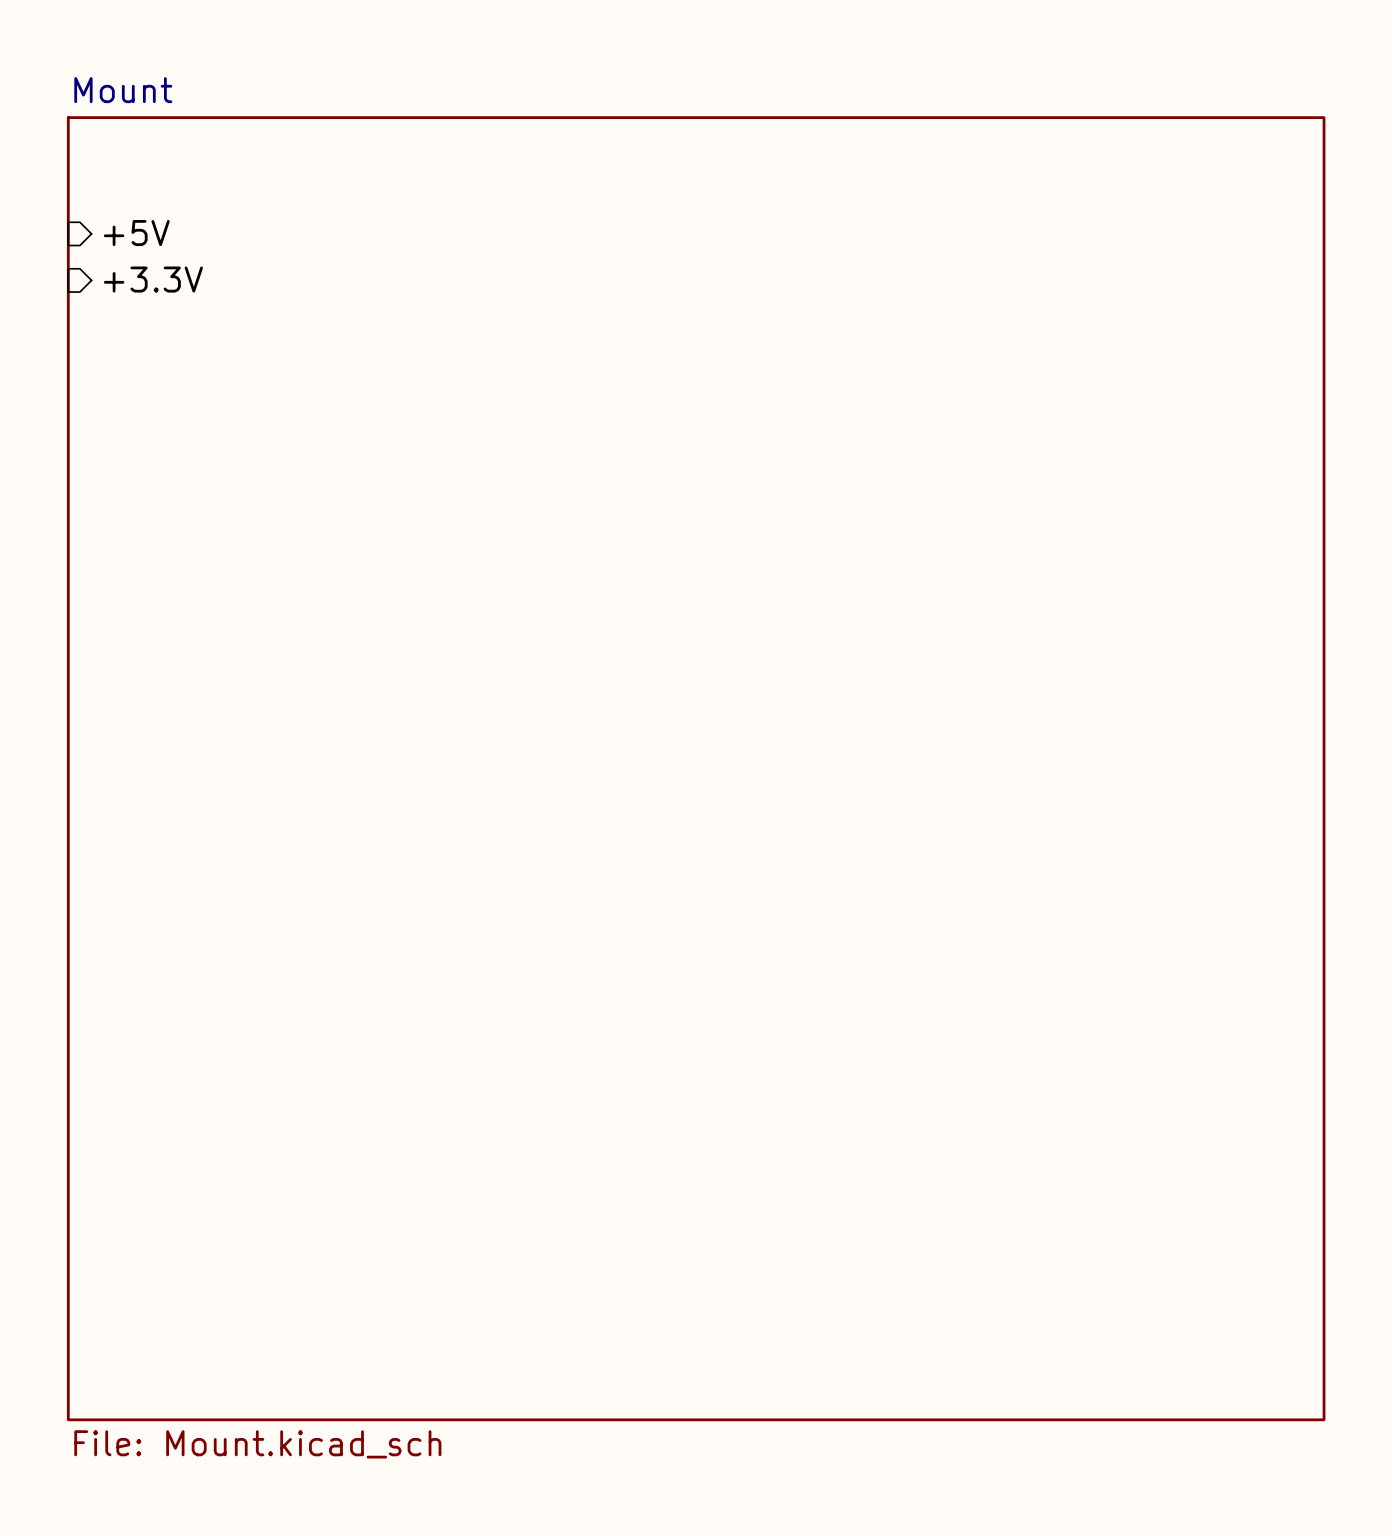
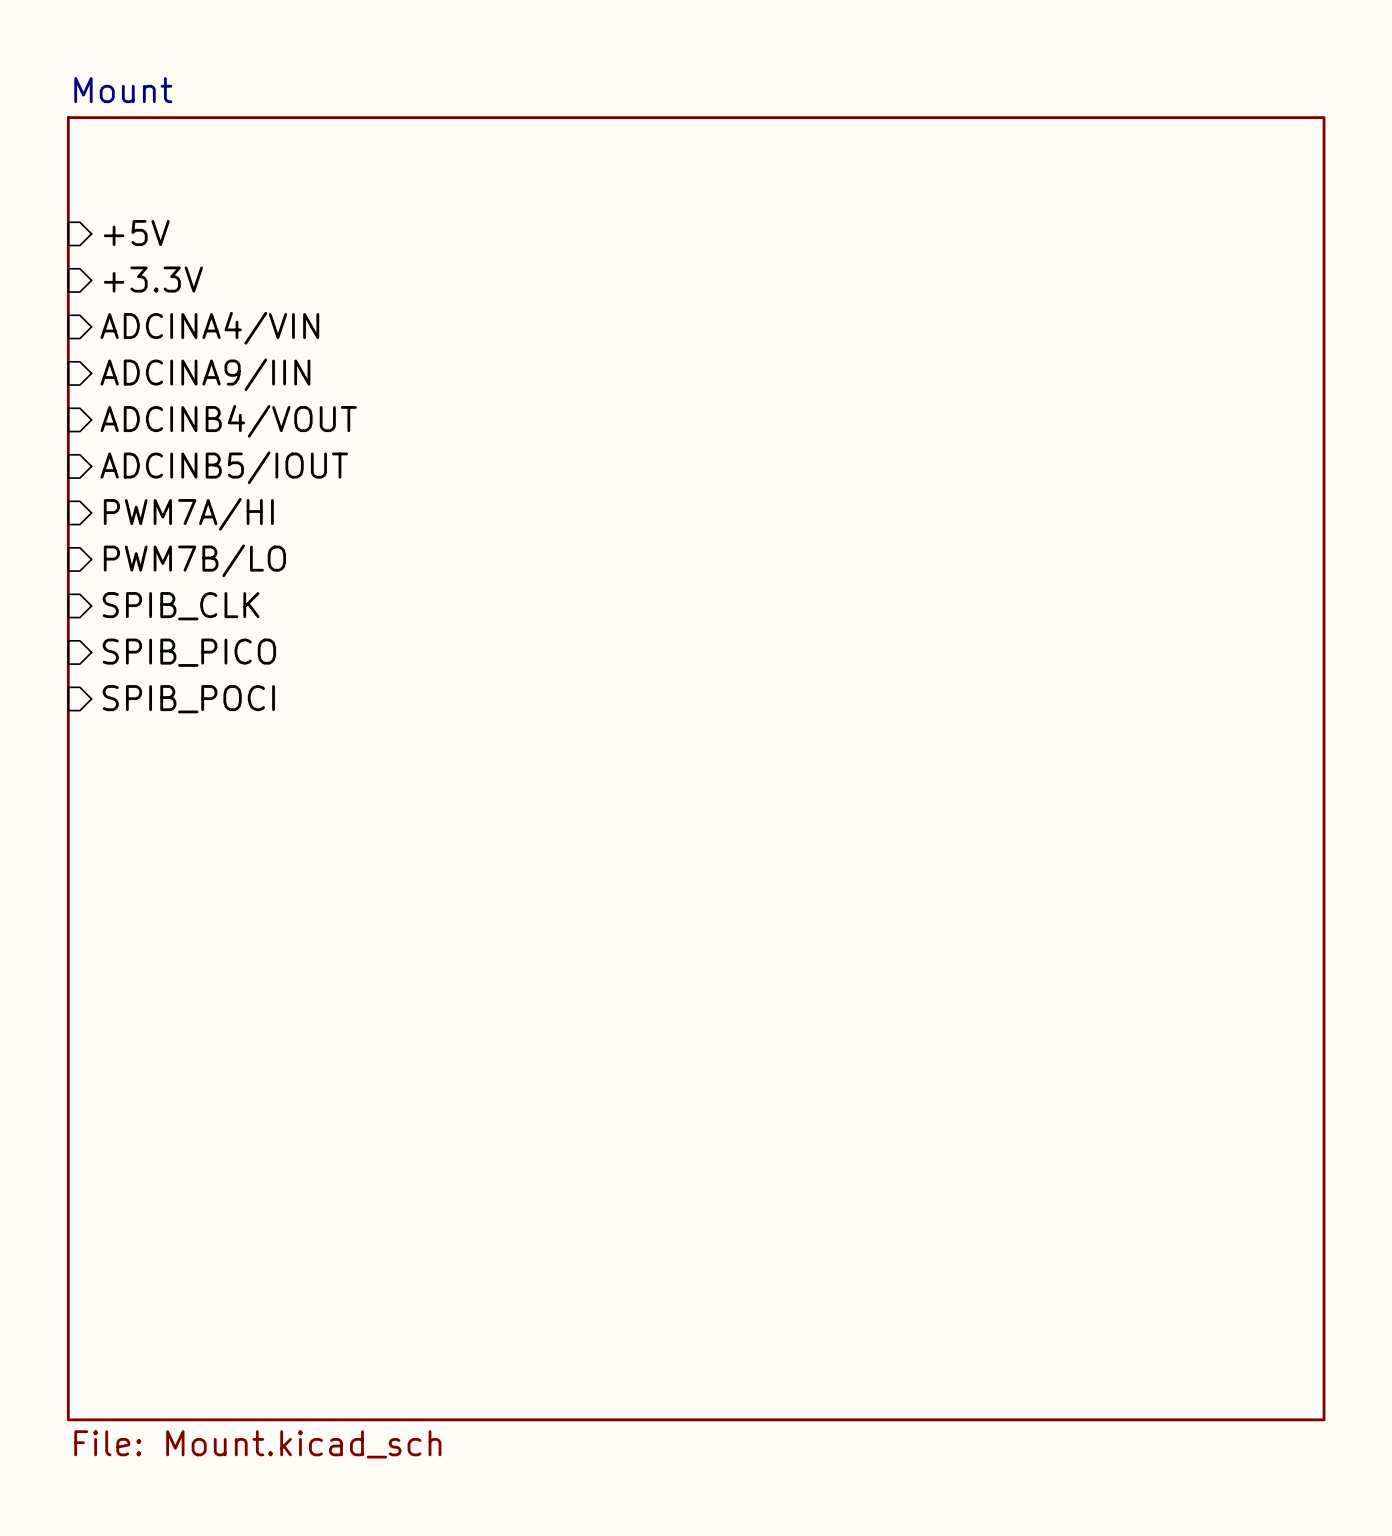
sheet pin: none -> ADCINA4/VIN (209, 328)
sheet pin: none -> ADCINA9/IIN (205, 374)
sheet pin: none -> ADCINB4/VOUT (228, 421)
sheet pin: none -> ADCINB5/IOUT (224, 467)
sheet pin: none -> PWM7A/HI (188, 514)
sheet pin: none -> PWM7B/LO (194, 560)
sheet pin: none -> SPIB_CLK (181, 606)
sheet pin: none -> SPIB_PICO (189, 652)
sheet pin: none -> SPIB_POCI (188, 699)

